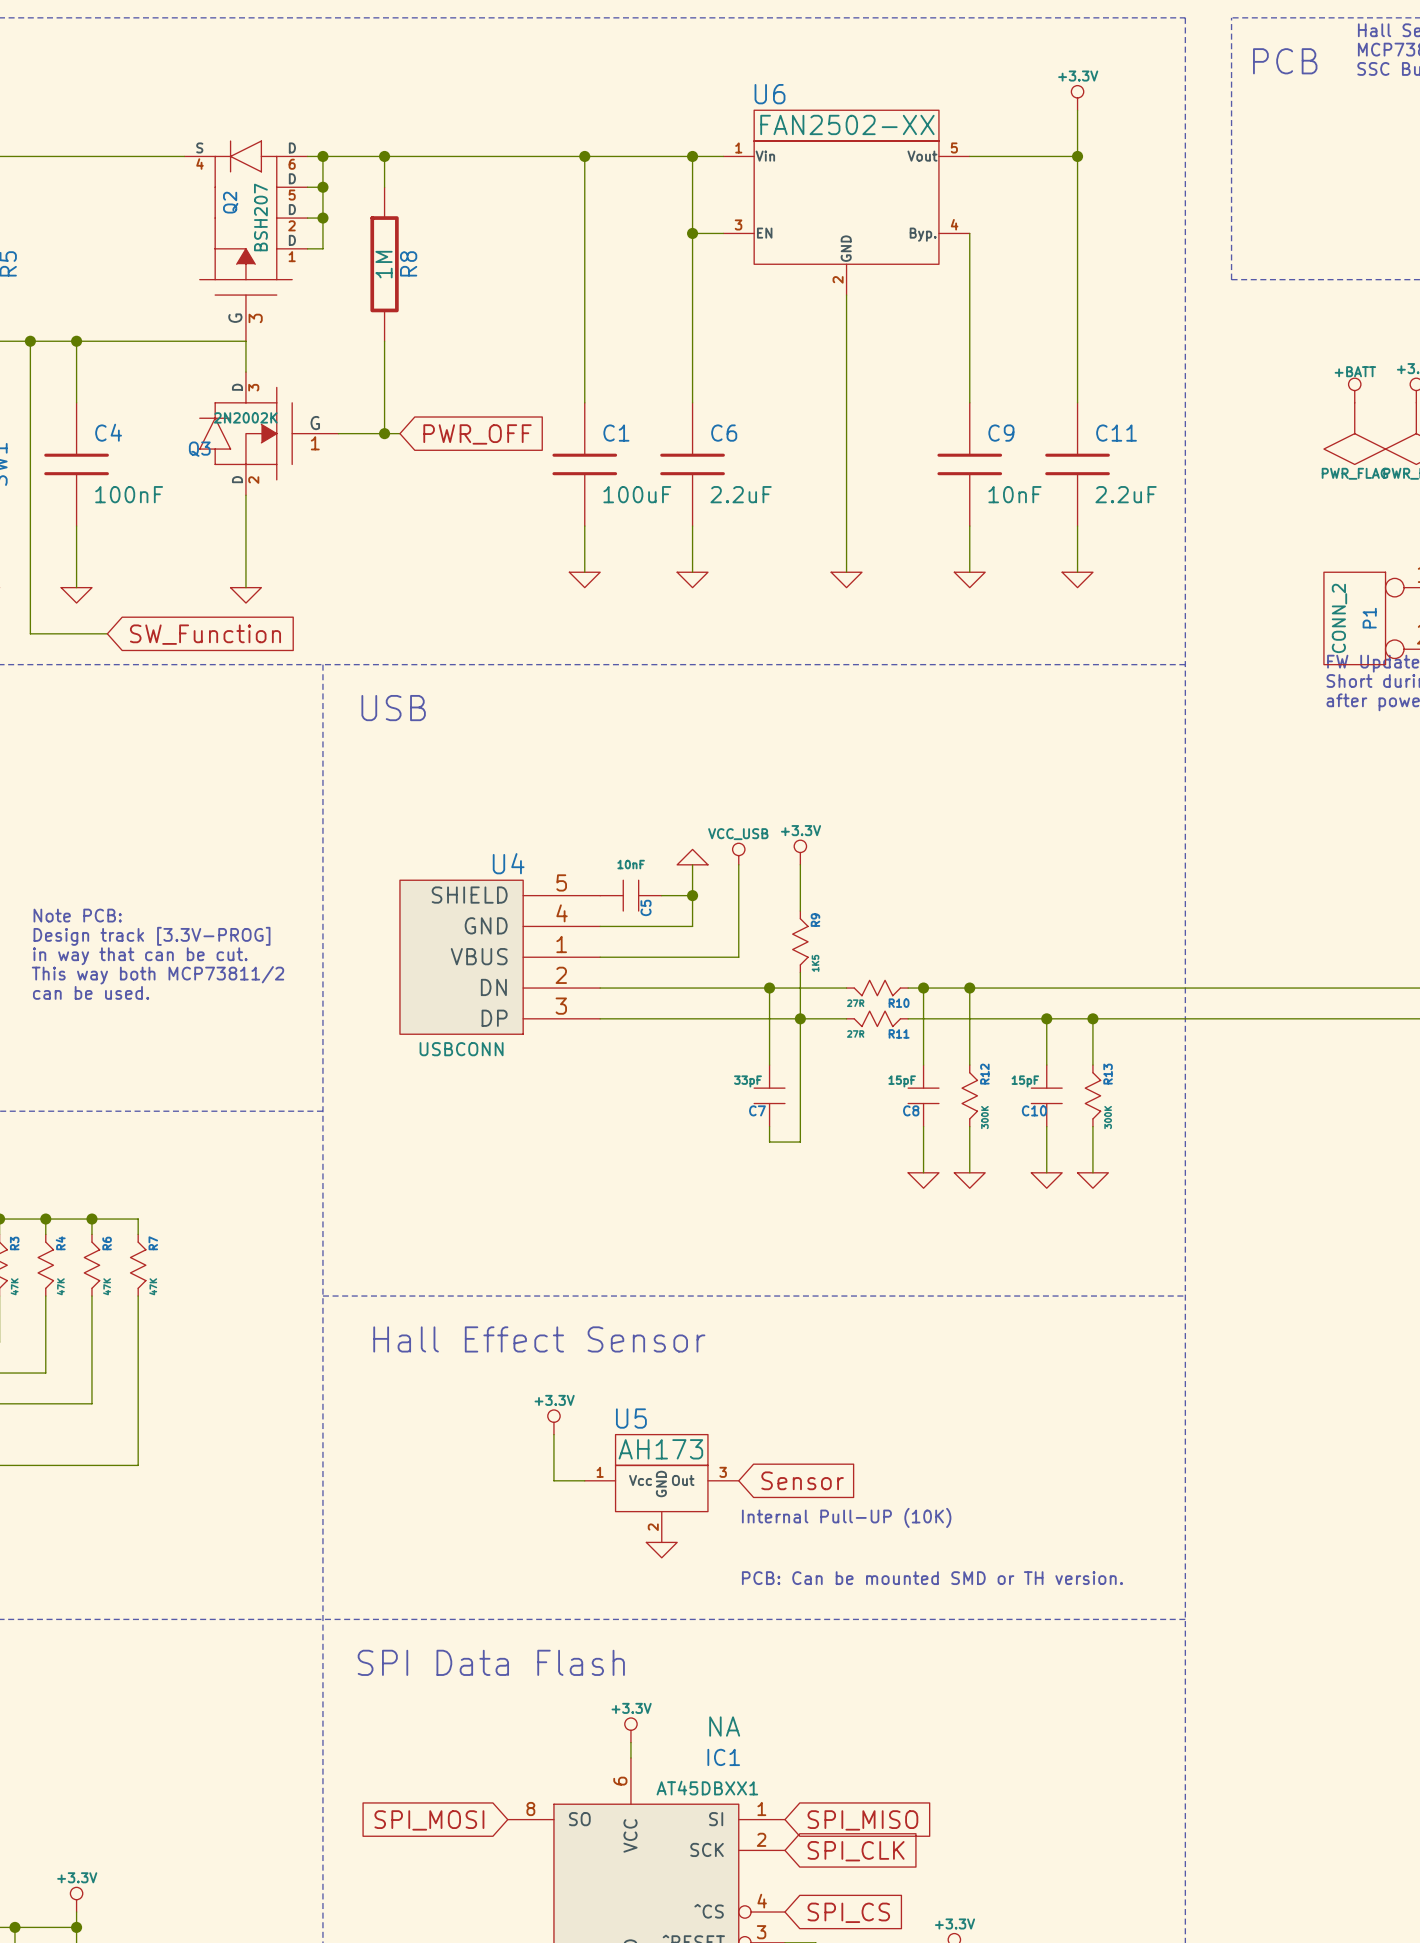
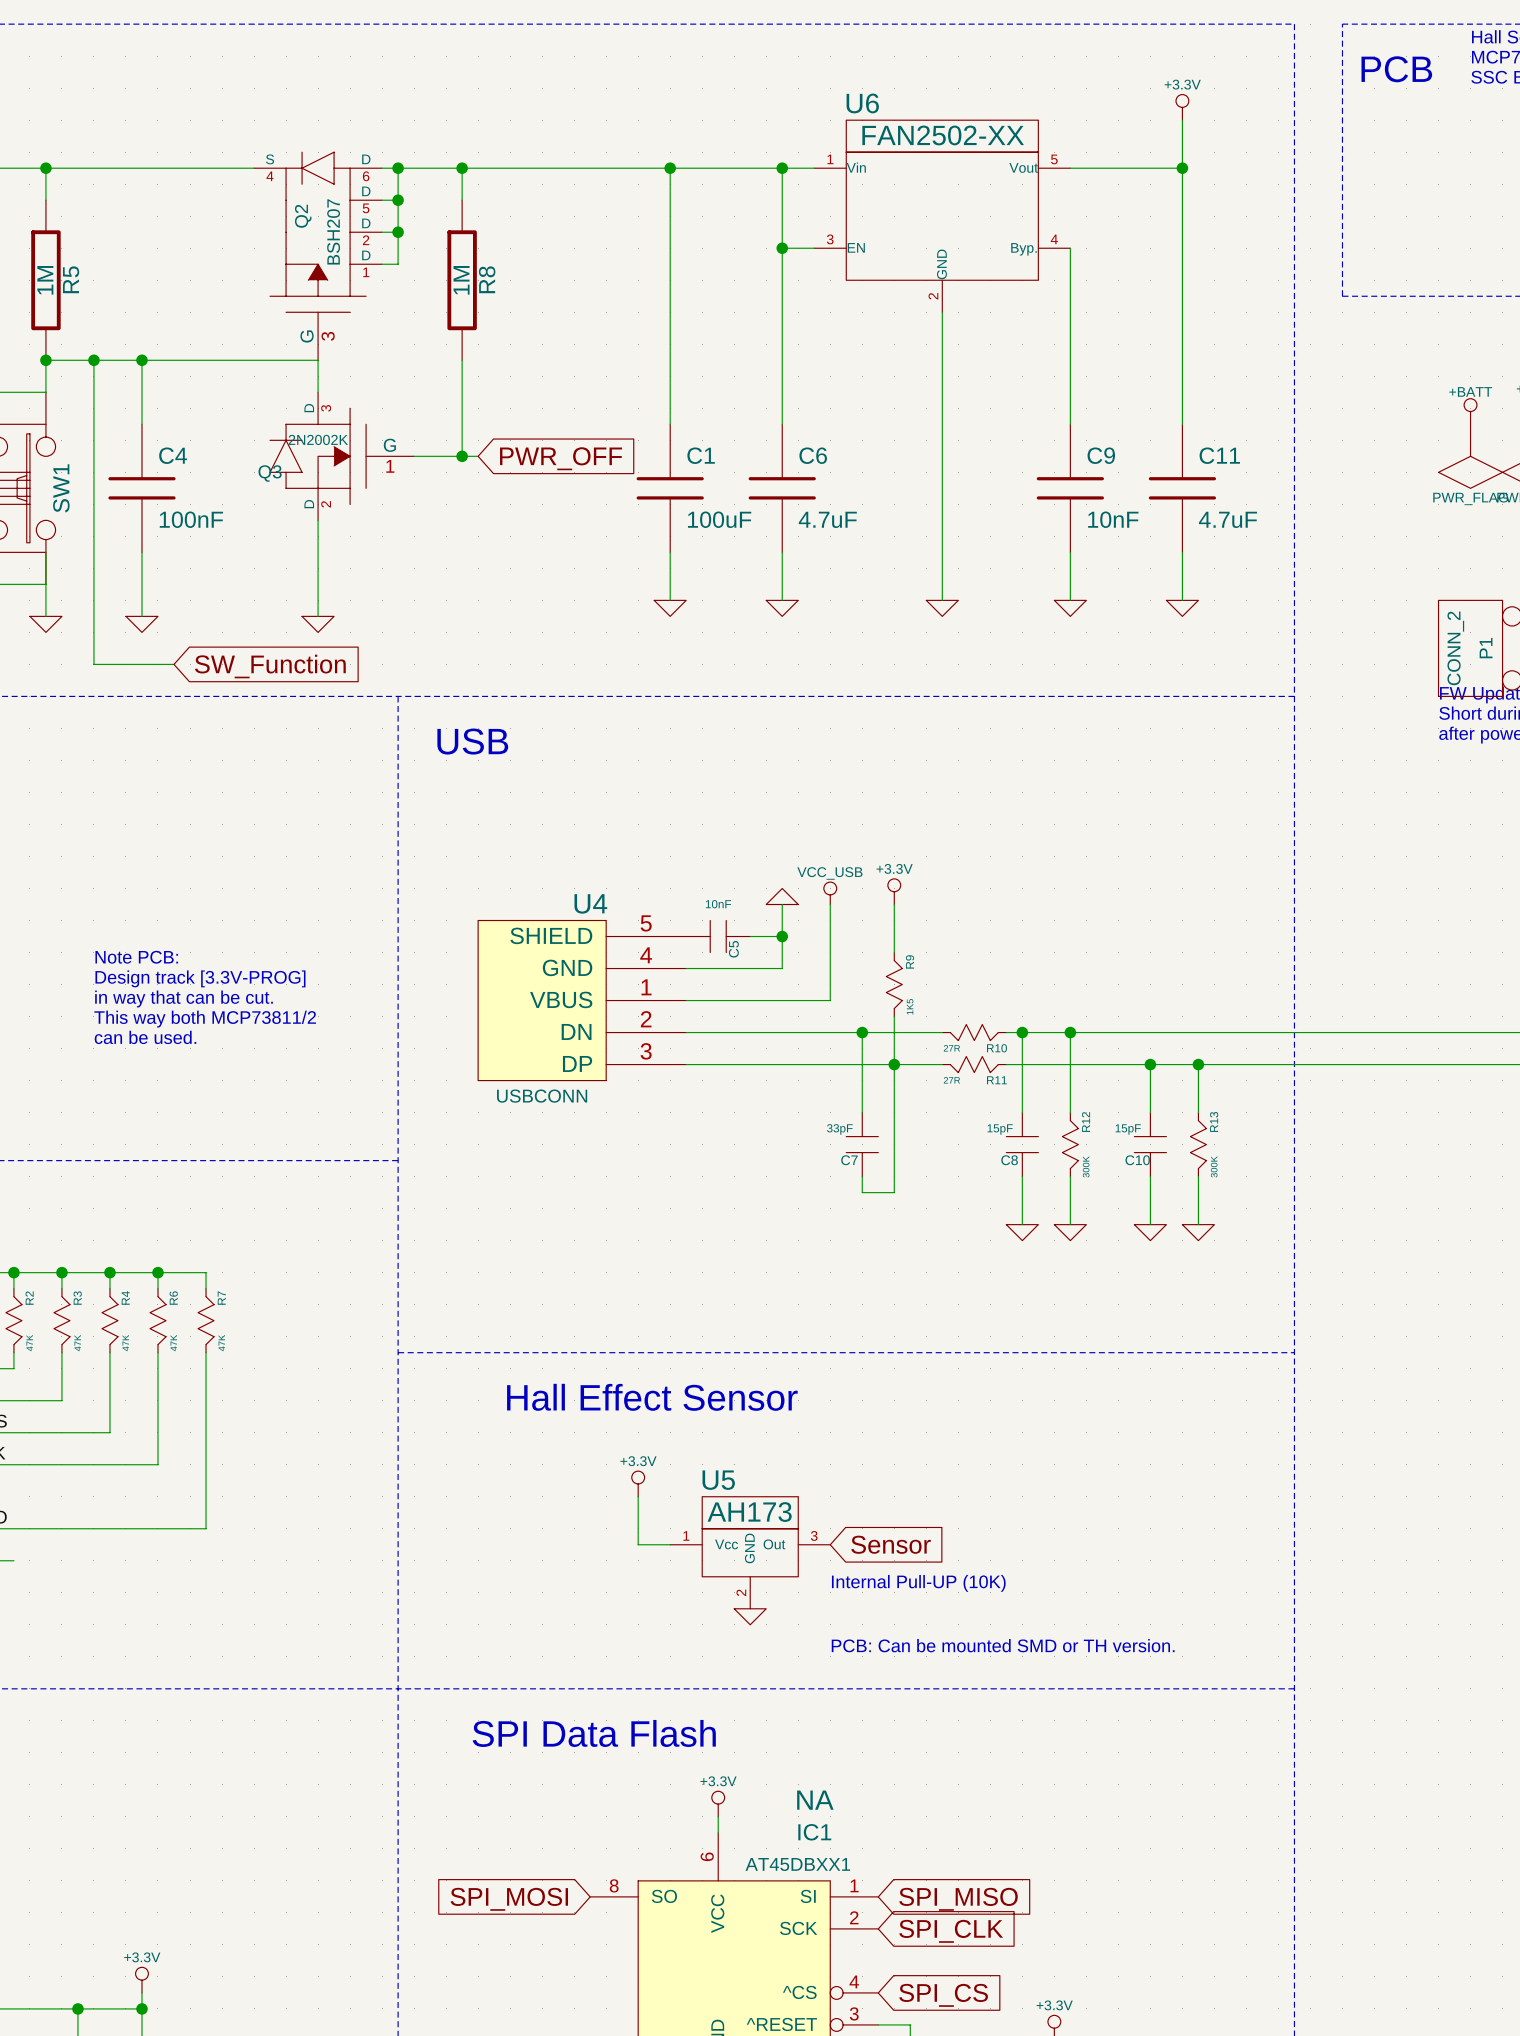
C6 value: 2.2uF (741, 494) -> 4.7uF (827, 519)
C11 value: 2.2uF (1126, 494) -> 4.7uF (1227, 519)

